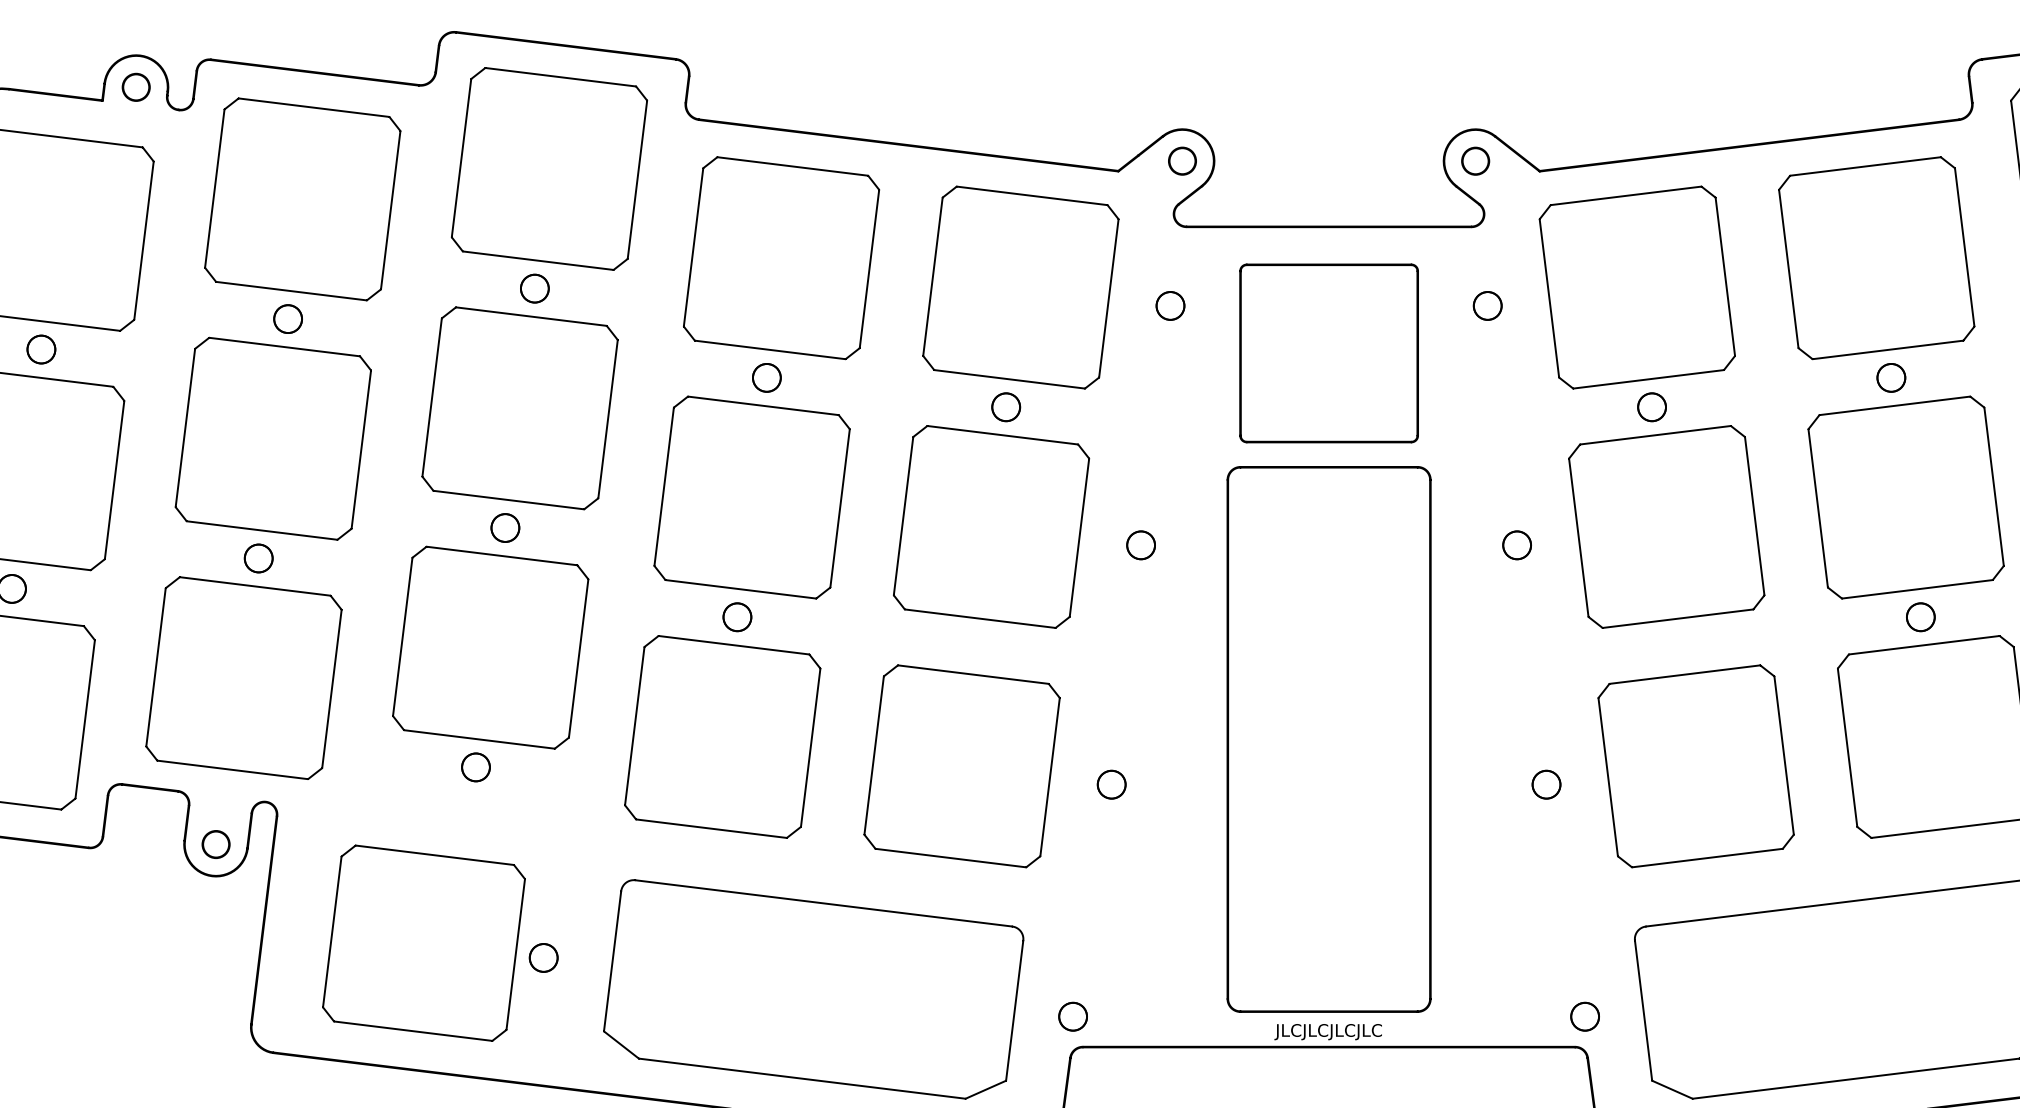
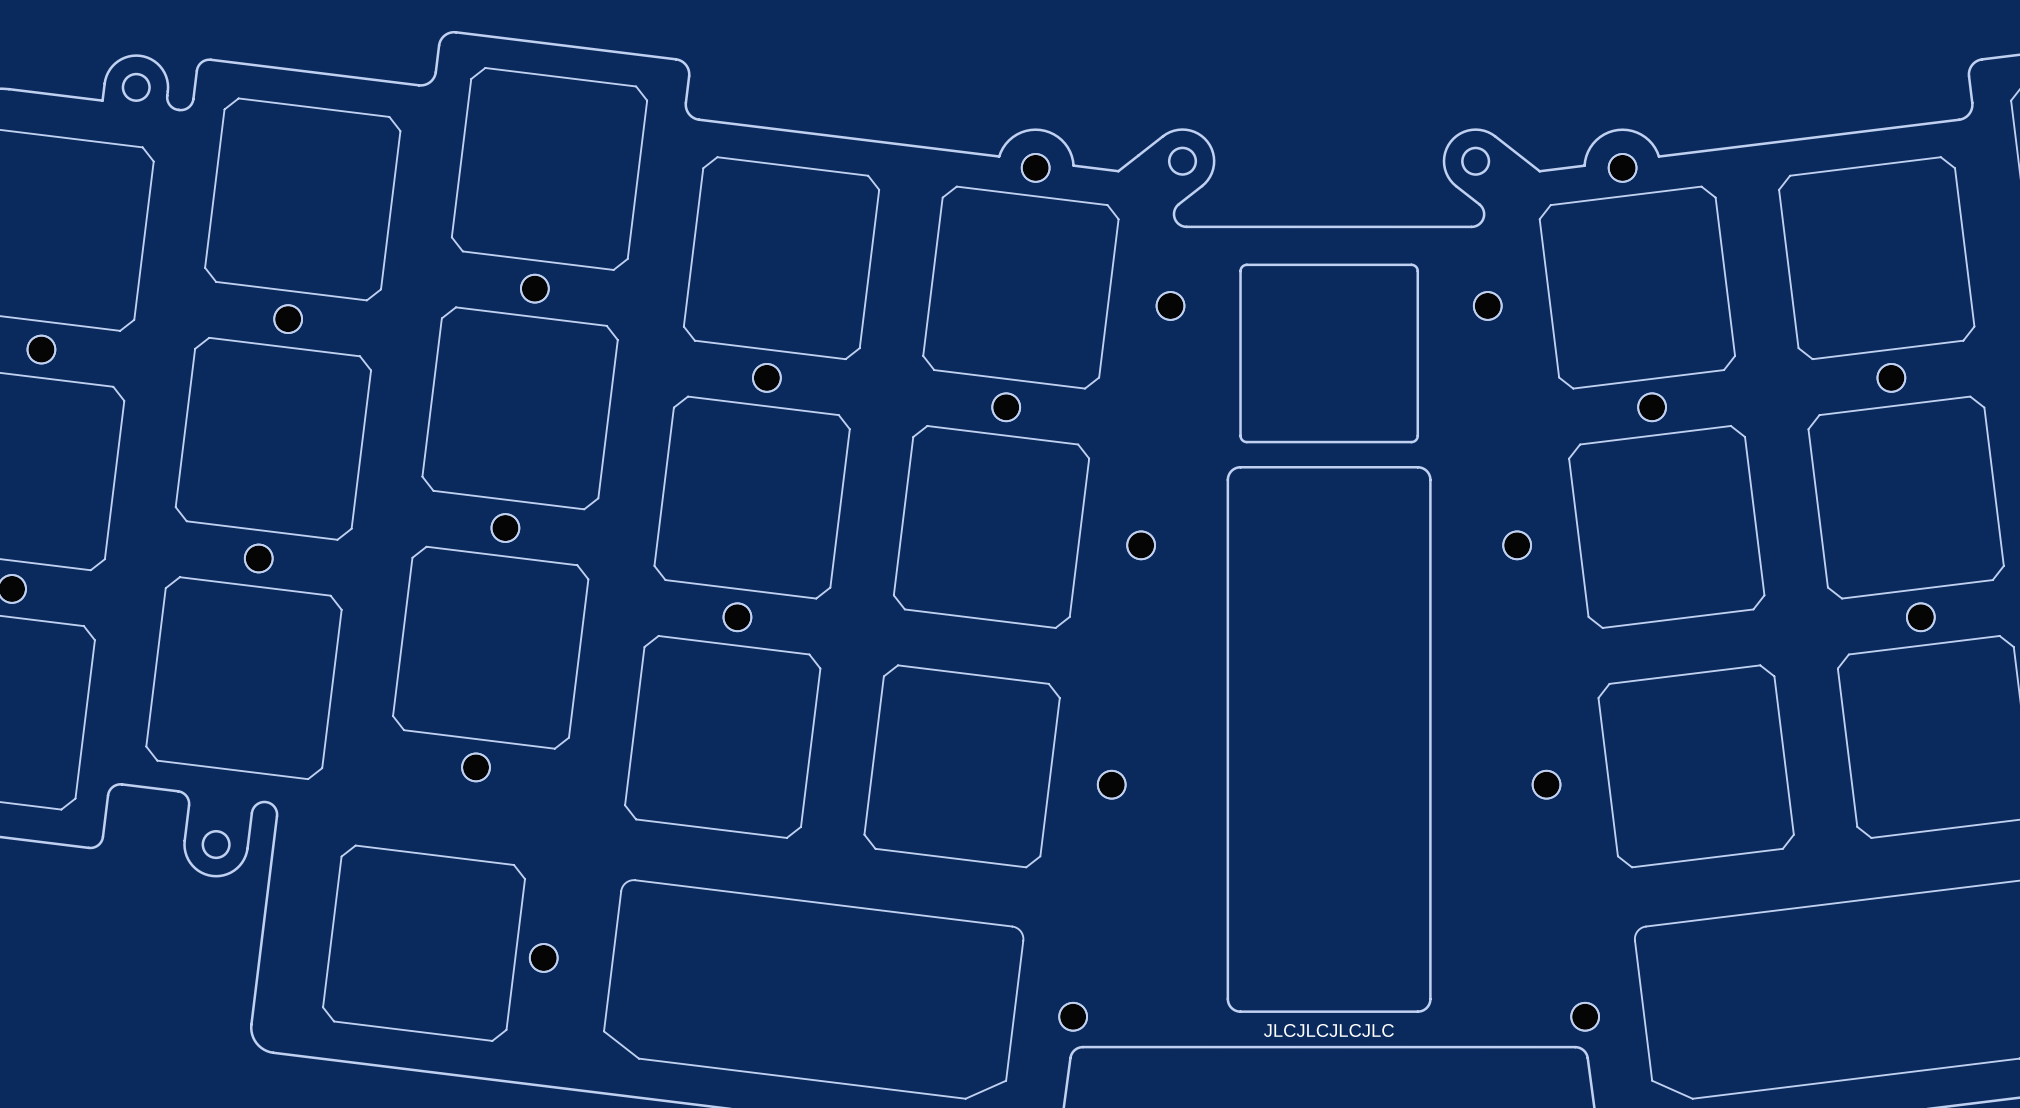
board edge: (699, 119) (1118, 171) -> (699, 119) (999, 156) (1003, 147) (1012, 137) (1025, 130) (1040, 129) (1053, 134) (1064, 143) (1071, 156) (1073, 165) (1118, 171)
board edge: (1959, 119) (1539, 171) -> (1959, 119) (1658, 156) (1654, 147) (1645, 137) (1632, 130) (1617, 130) (1604, 134) (1593, 143) (1586, 156) (1584, 165) (1539, 171)
part: none -> (1035, 167)
part: none -> (1622, 167)

